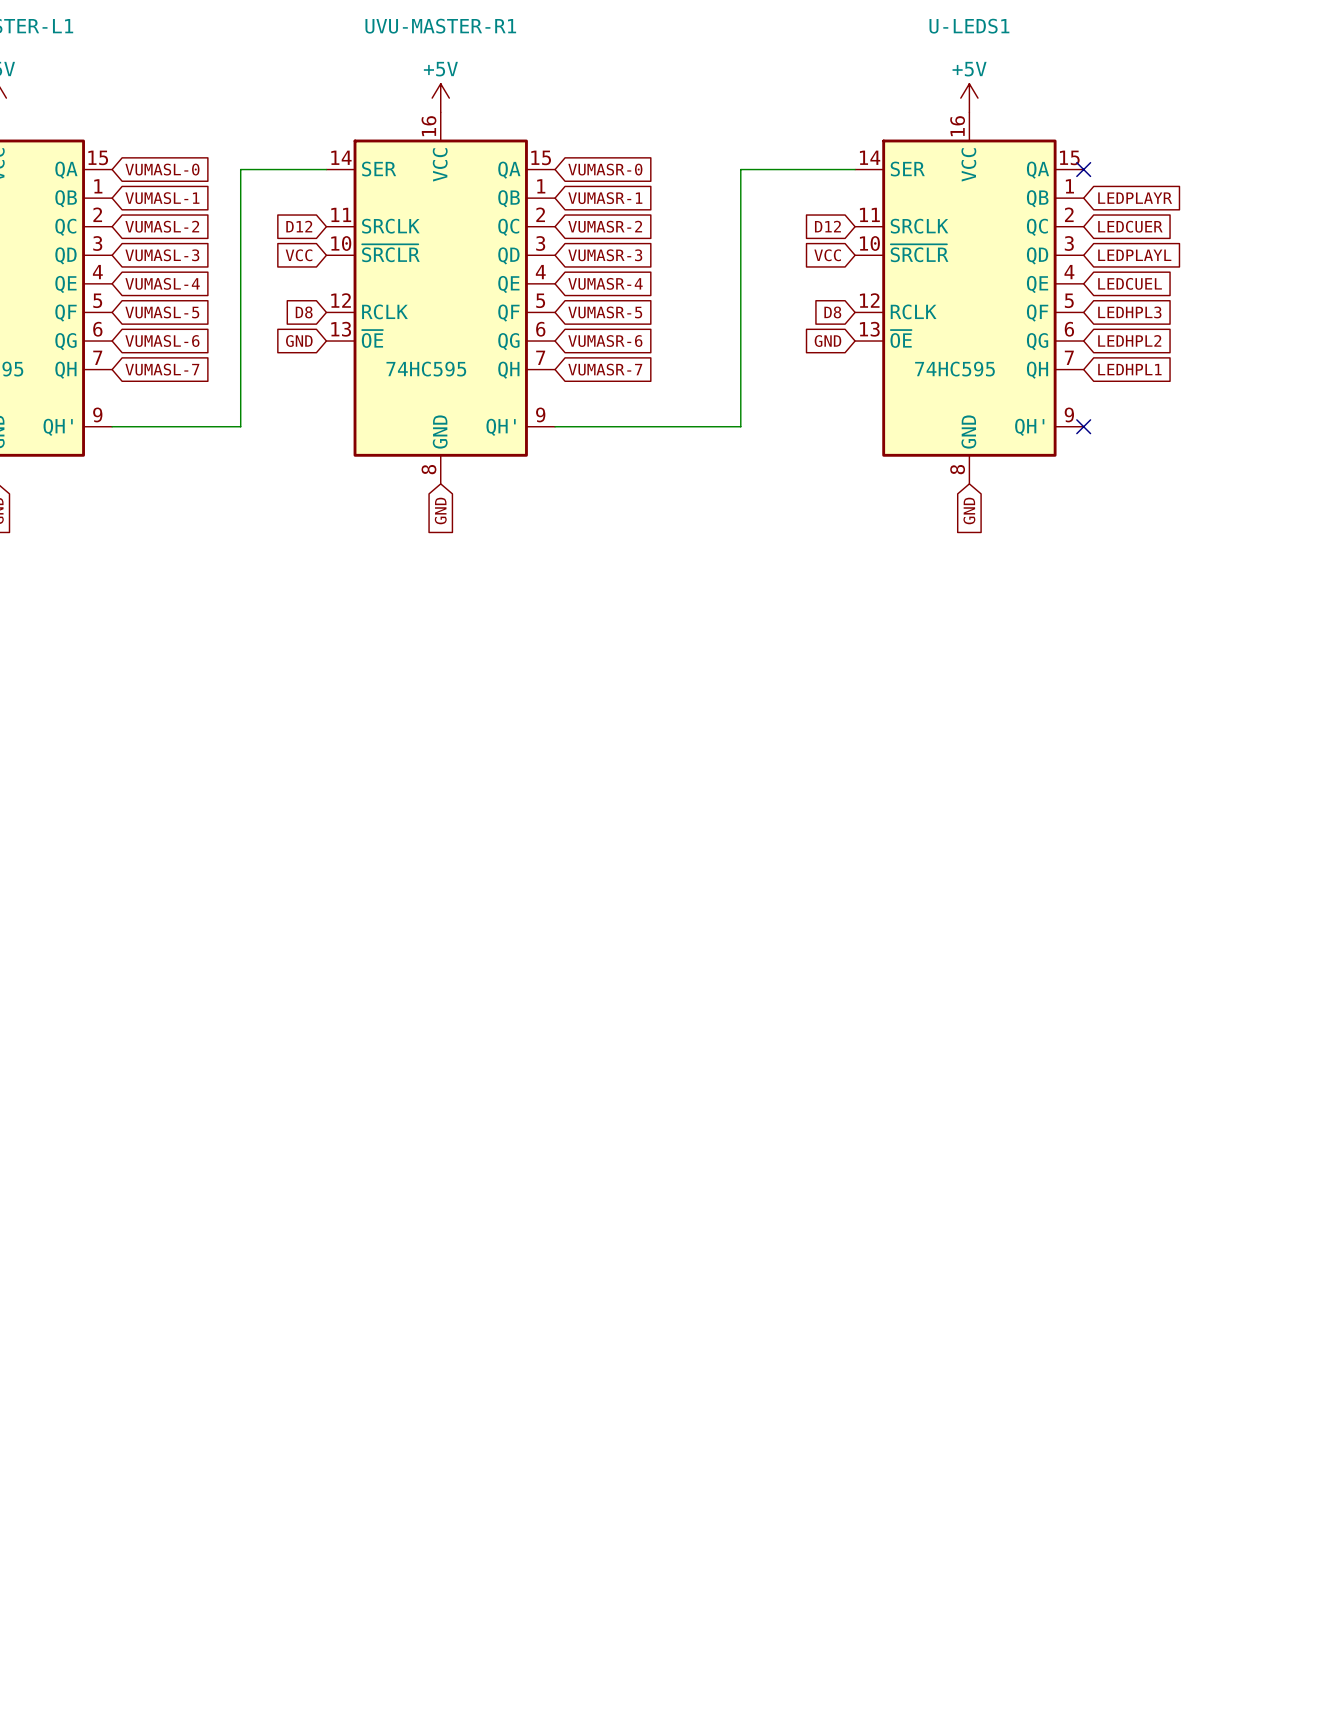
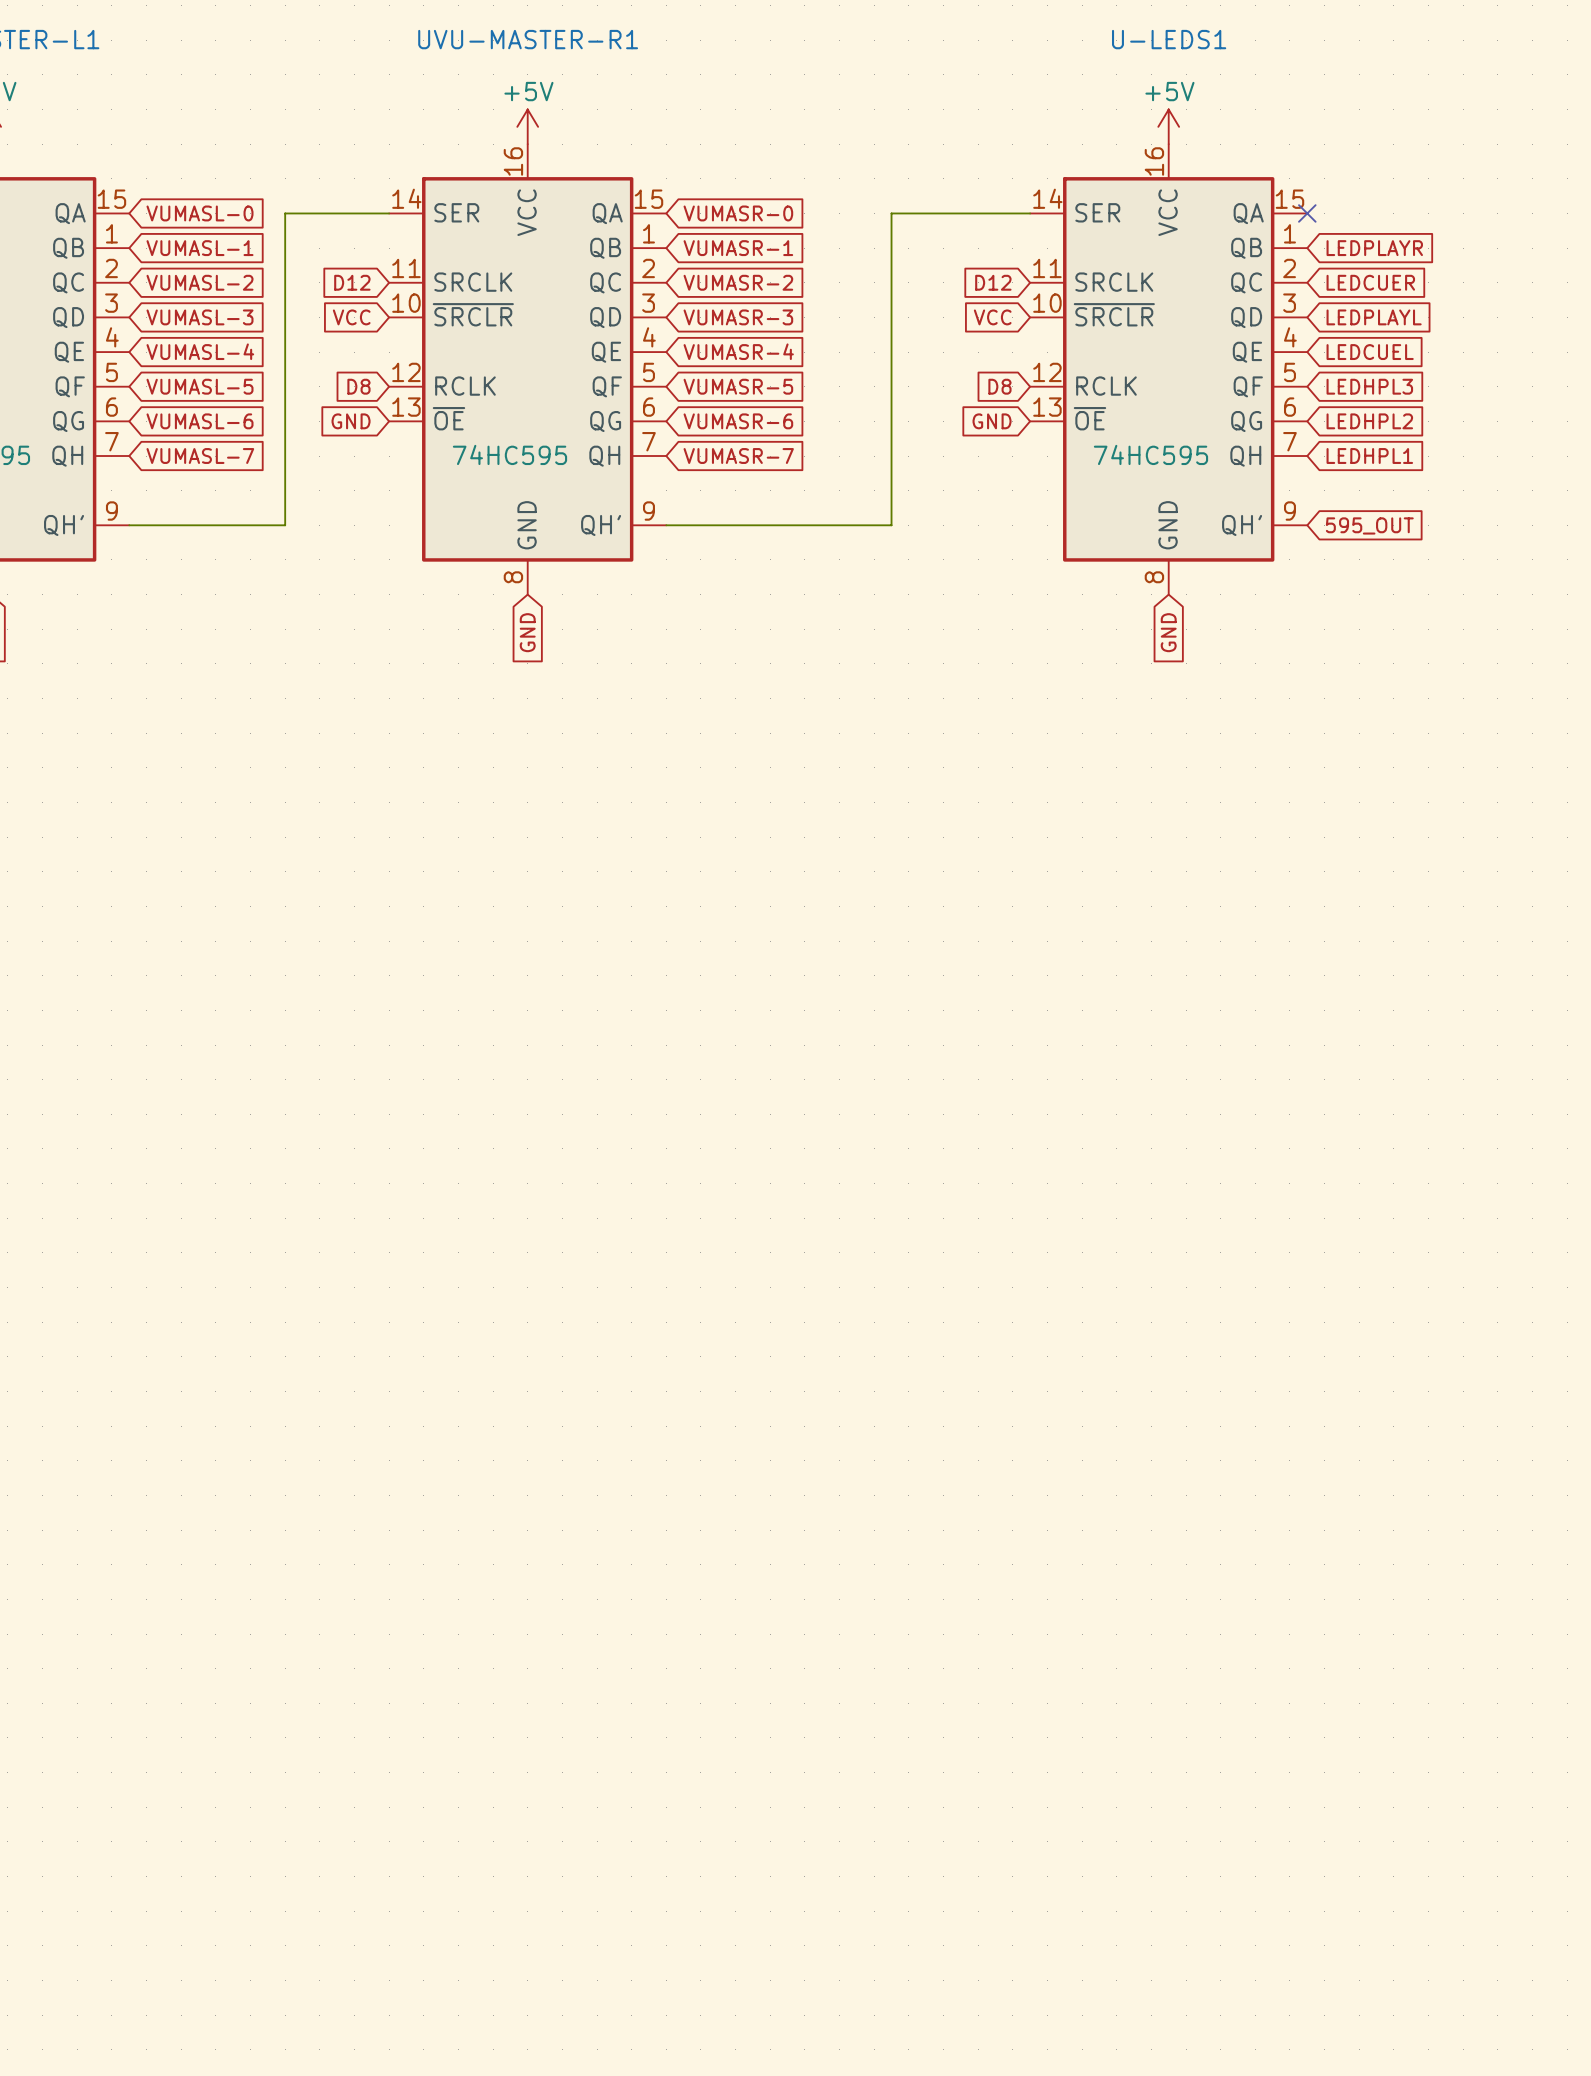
no-connect mark: (1083, 426) -> none
global label: none -> 595_OUT (1369, 525)

